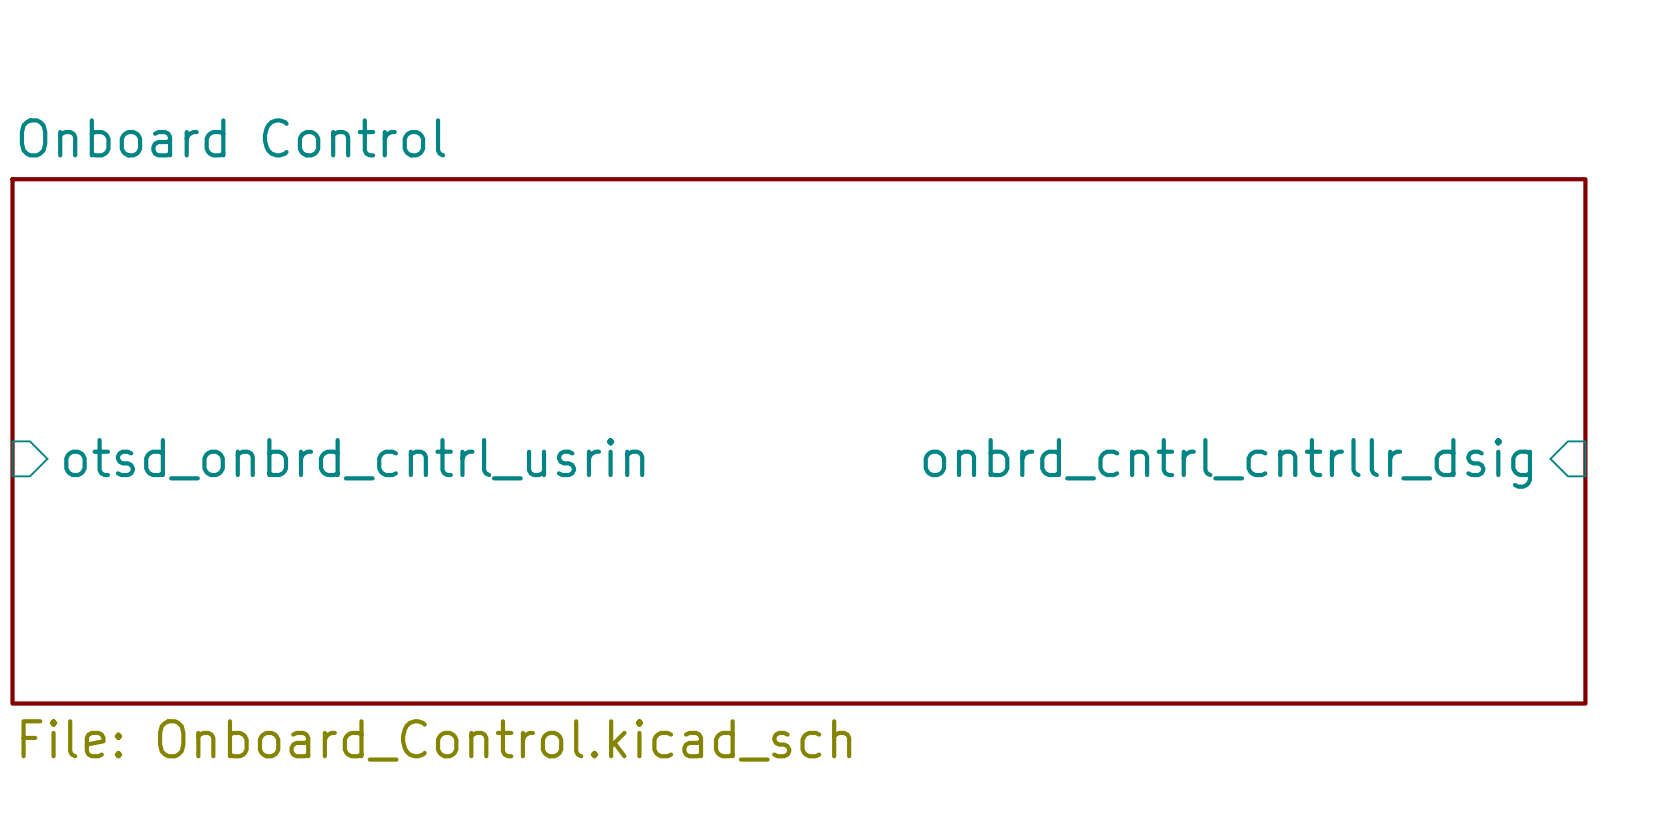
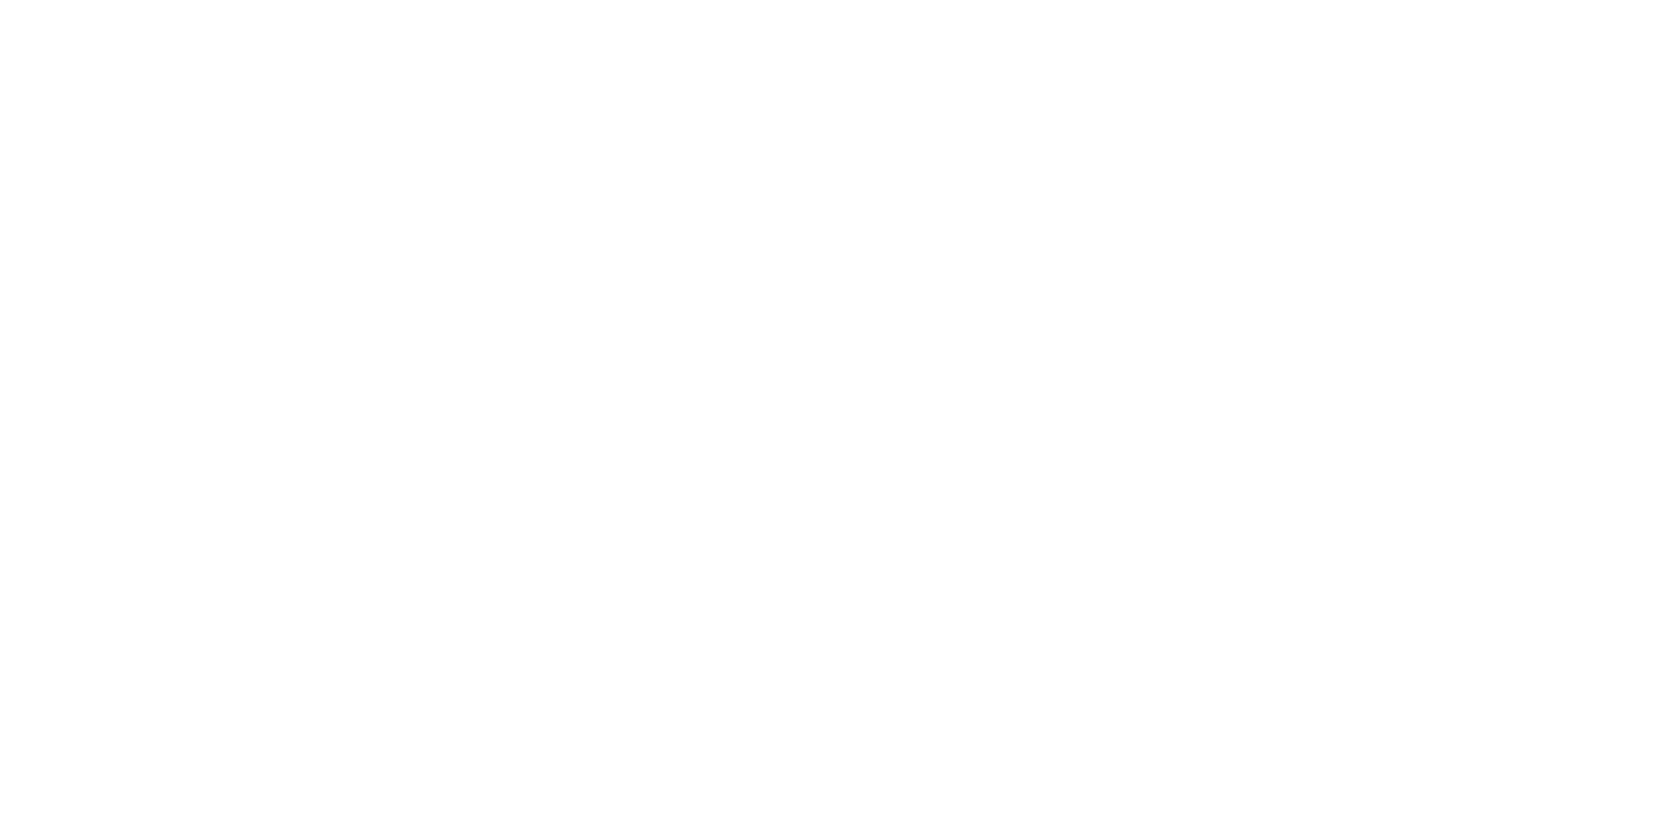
sheet Onboard Control: File: Onboard_Control.kicad_sch (798, 441) -> none
sheet pin: otsd_onbrd_cntrl_usrin (354, 459) -> none
sheet pin: onbrd_cntrl_cntrllr_dsig (1227, 463) -> none

